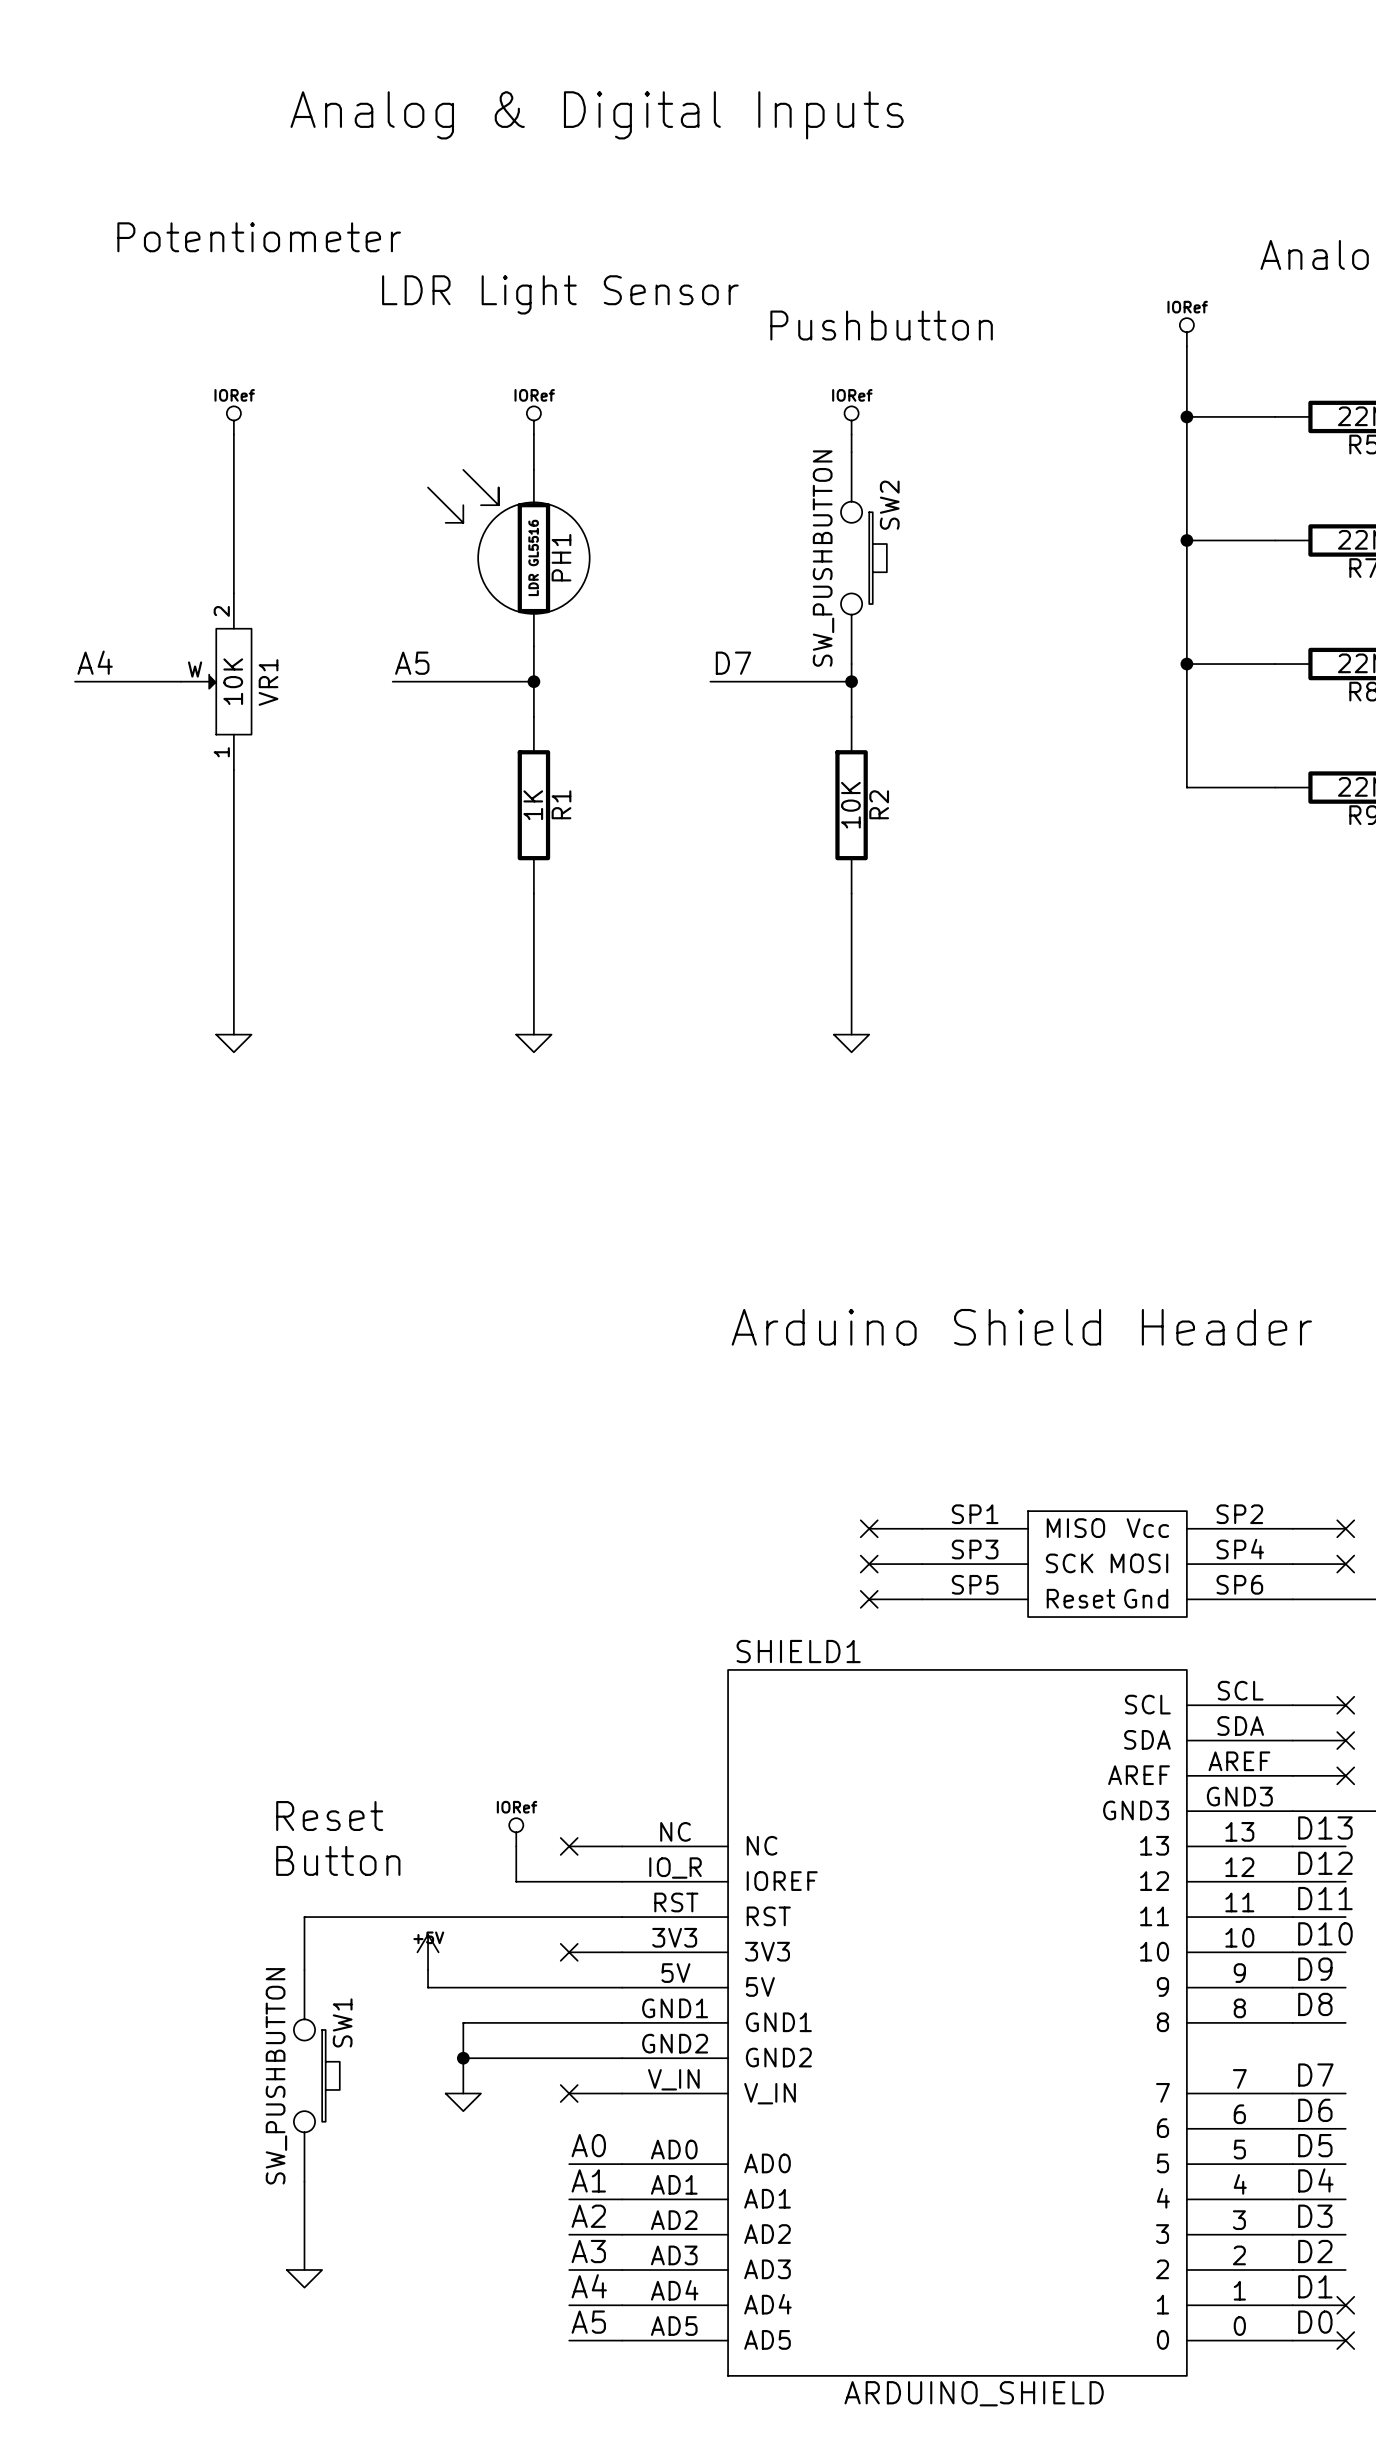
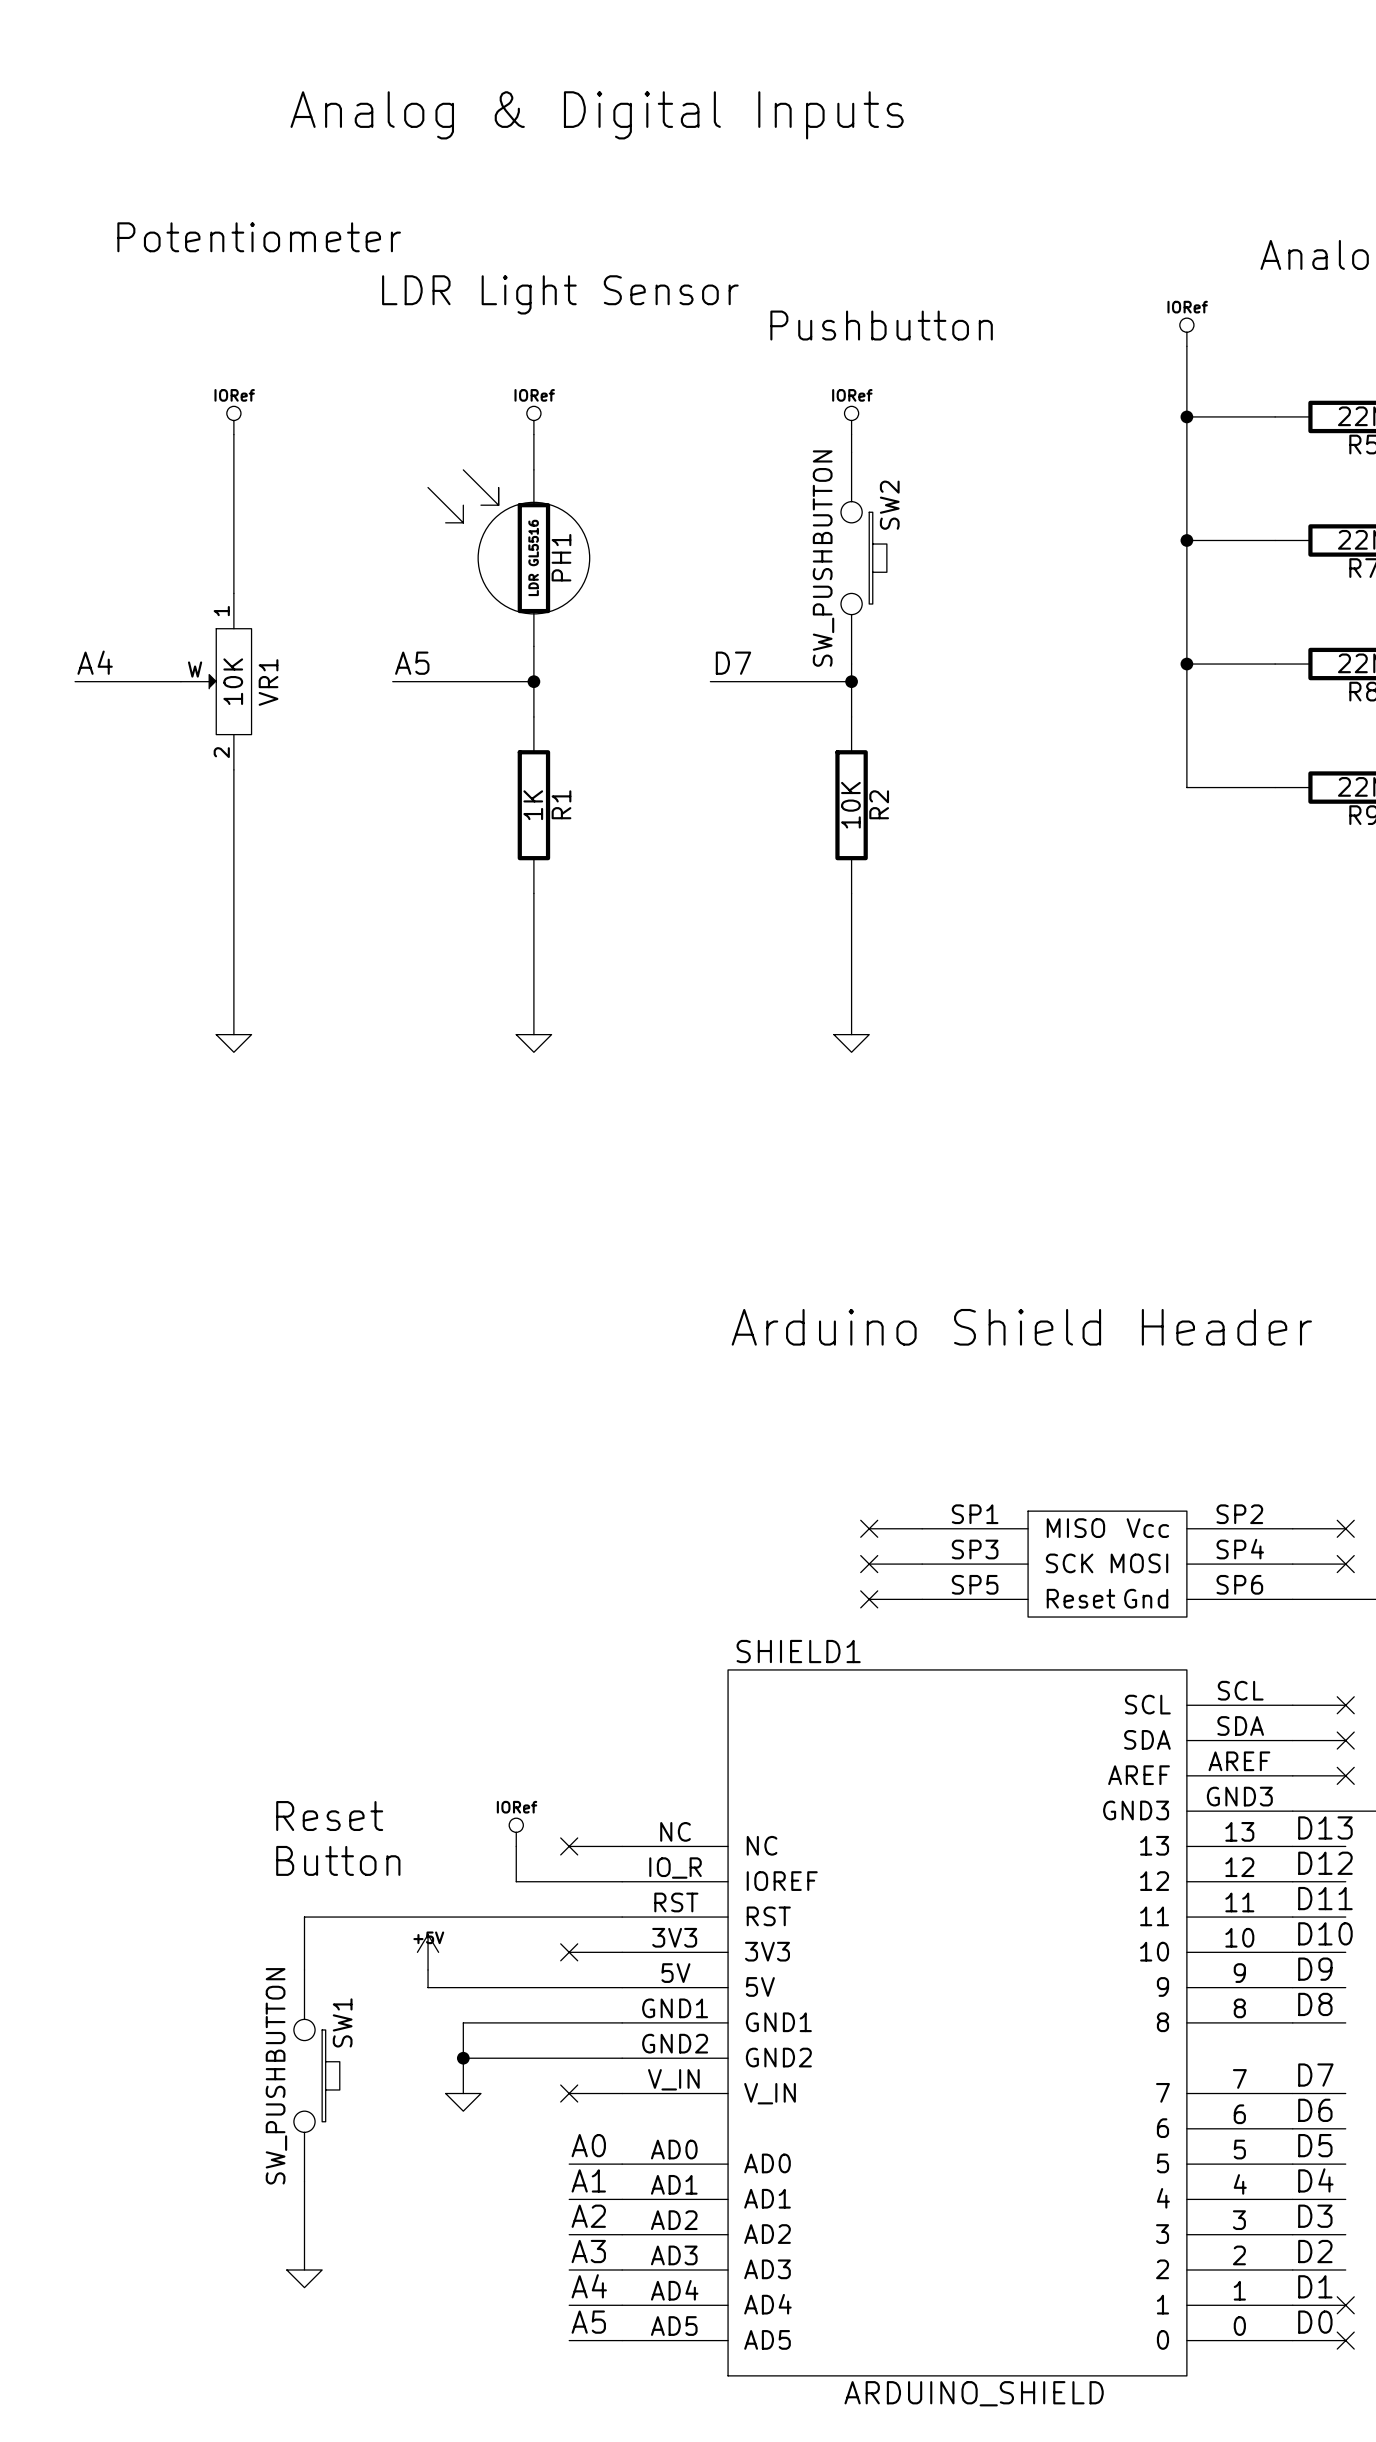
VR1 flip: as is (230, 681) -> up-down (230, 681)

